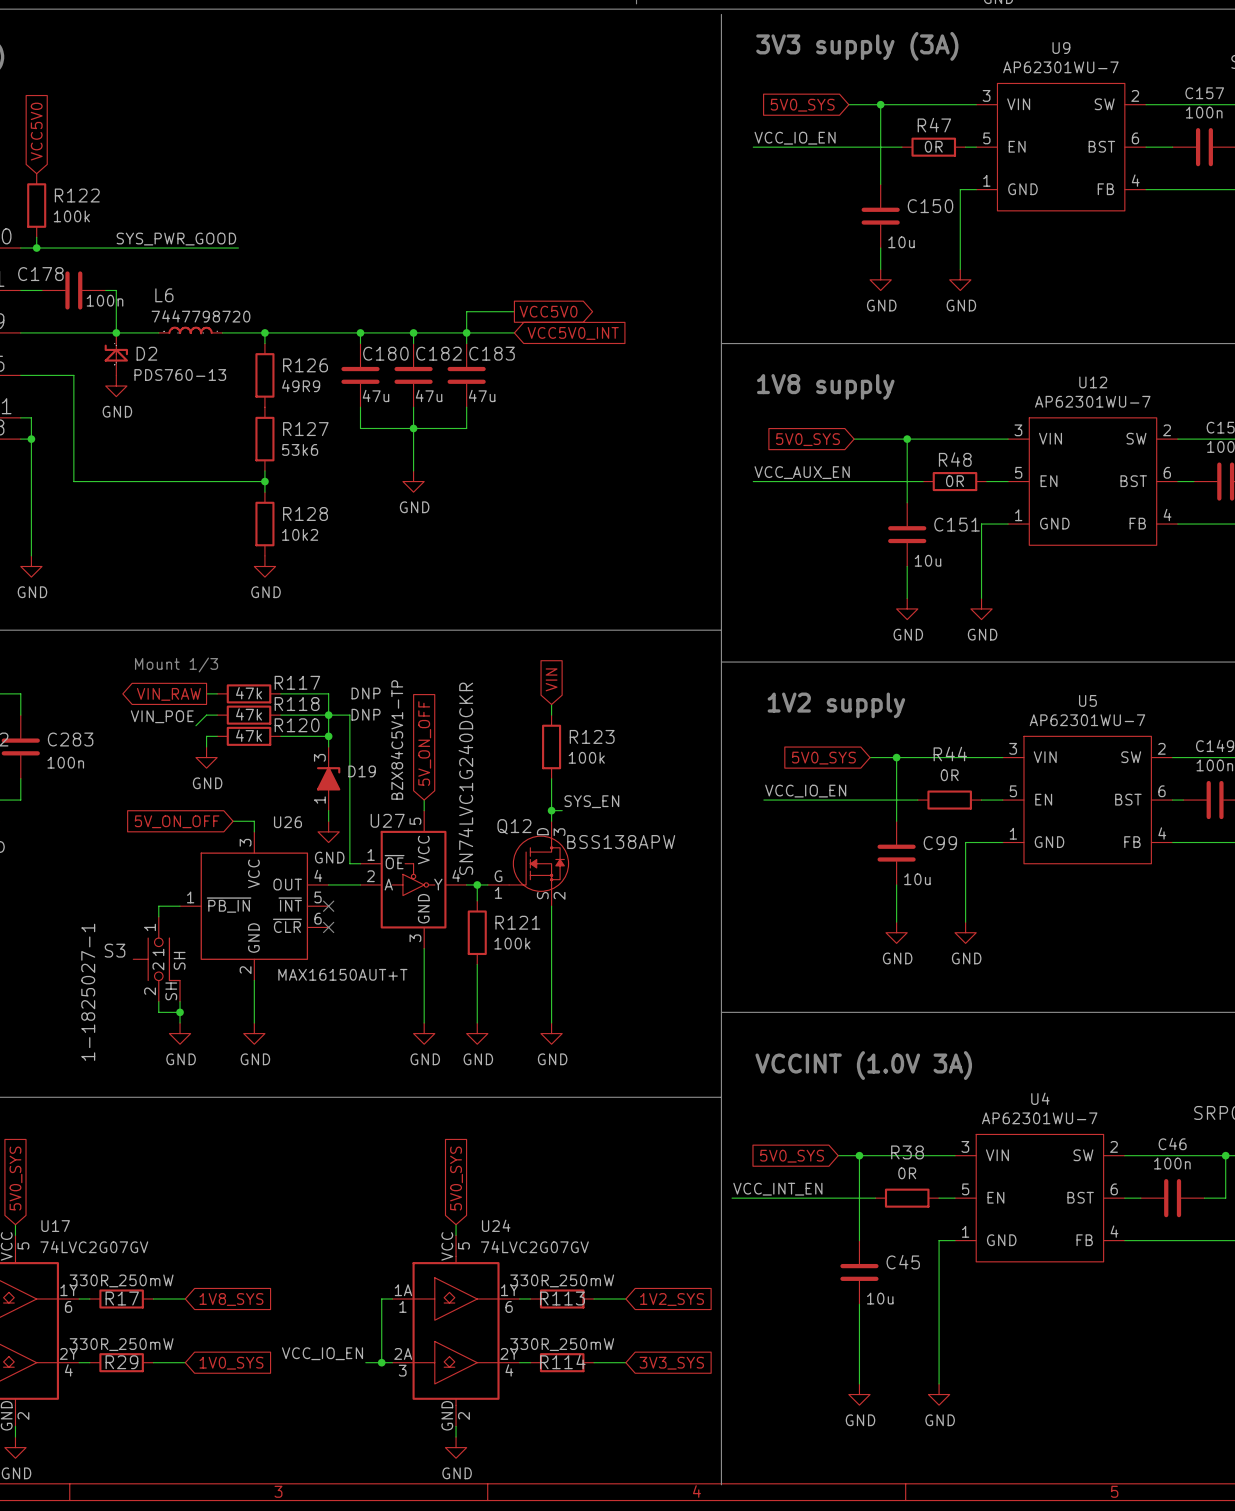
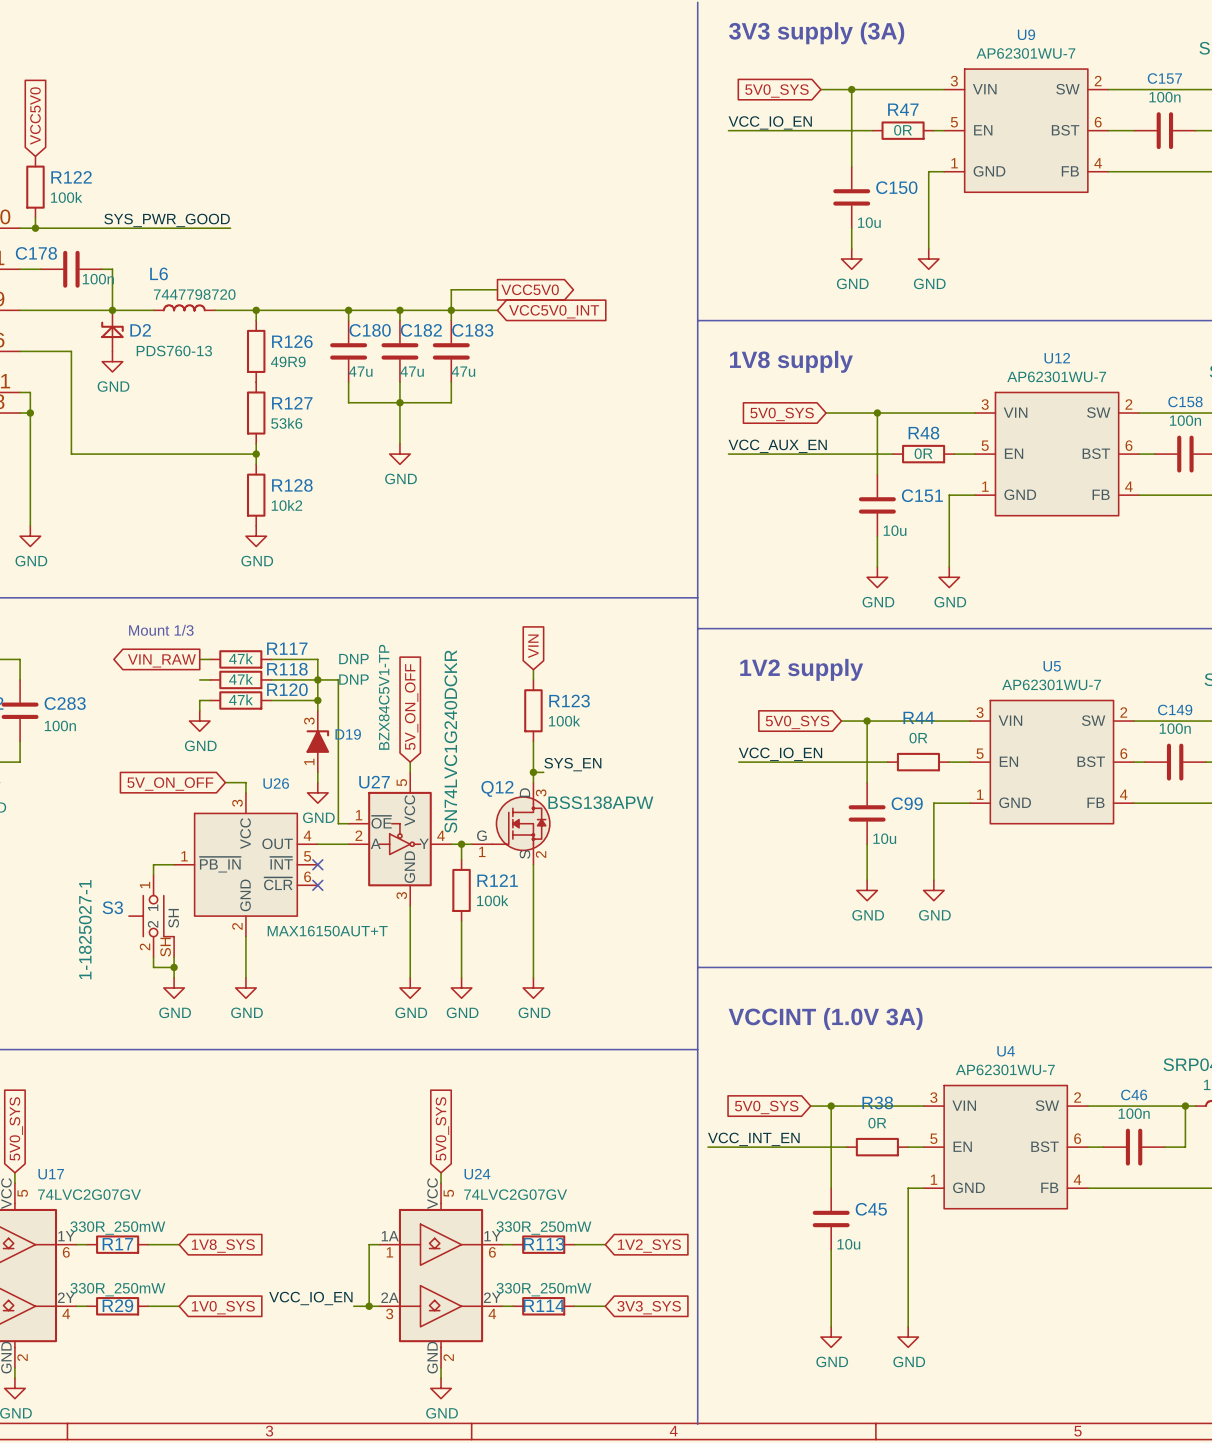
wire: (206, 715) (195, 725) -> none
label: VIN_POE (162, 716) -> none

